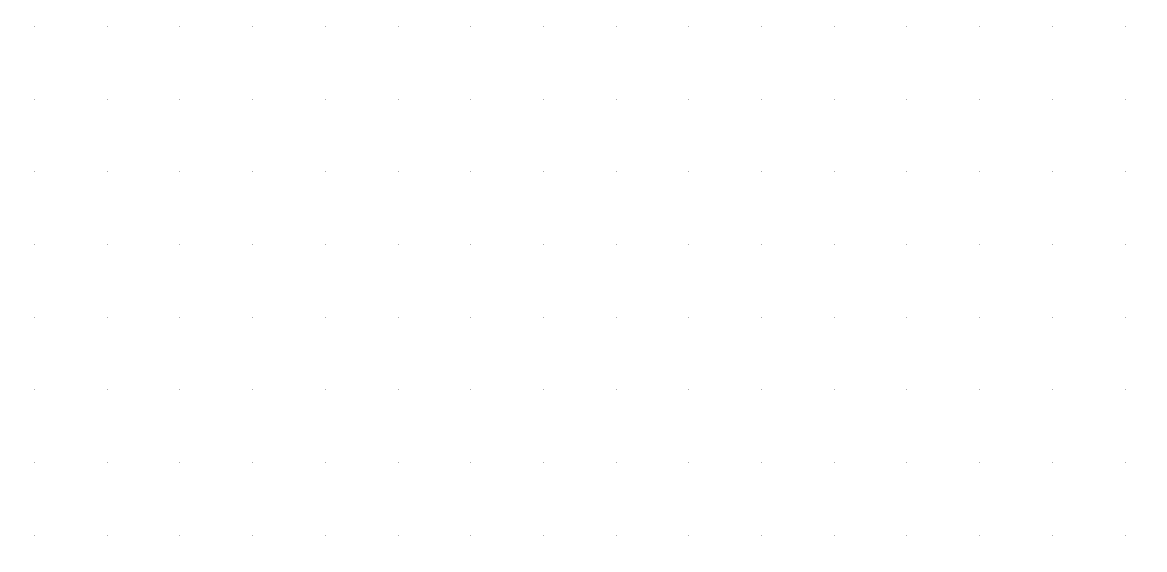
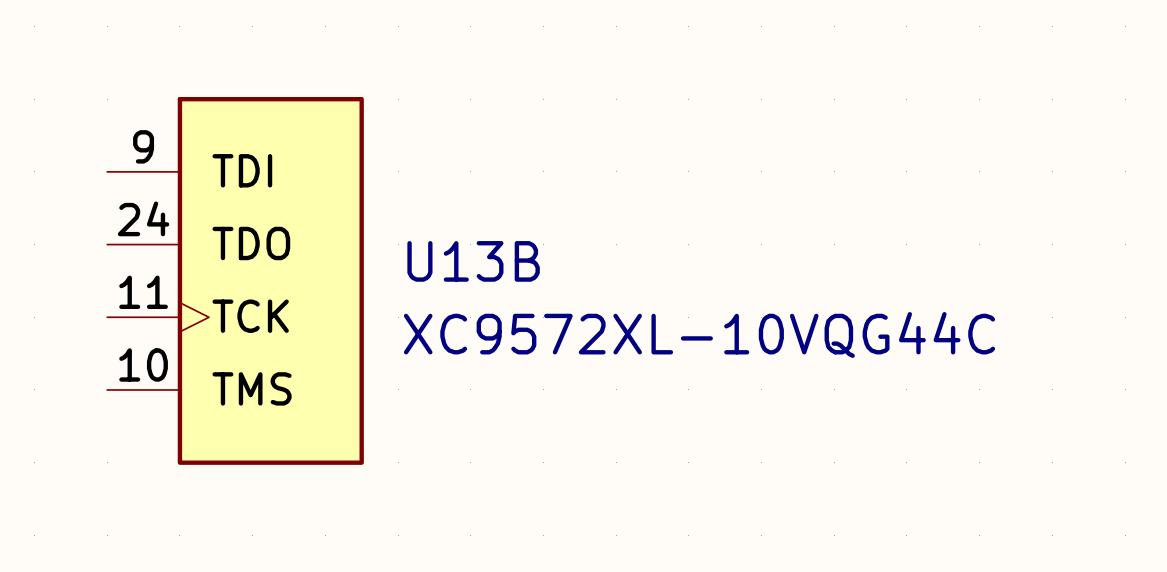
U13B: none -> XC9572XL-10VQG44C (235, 280)

